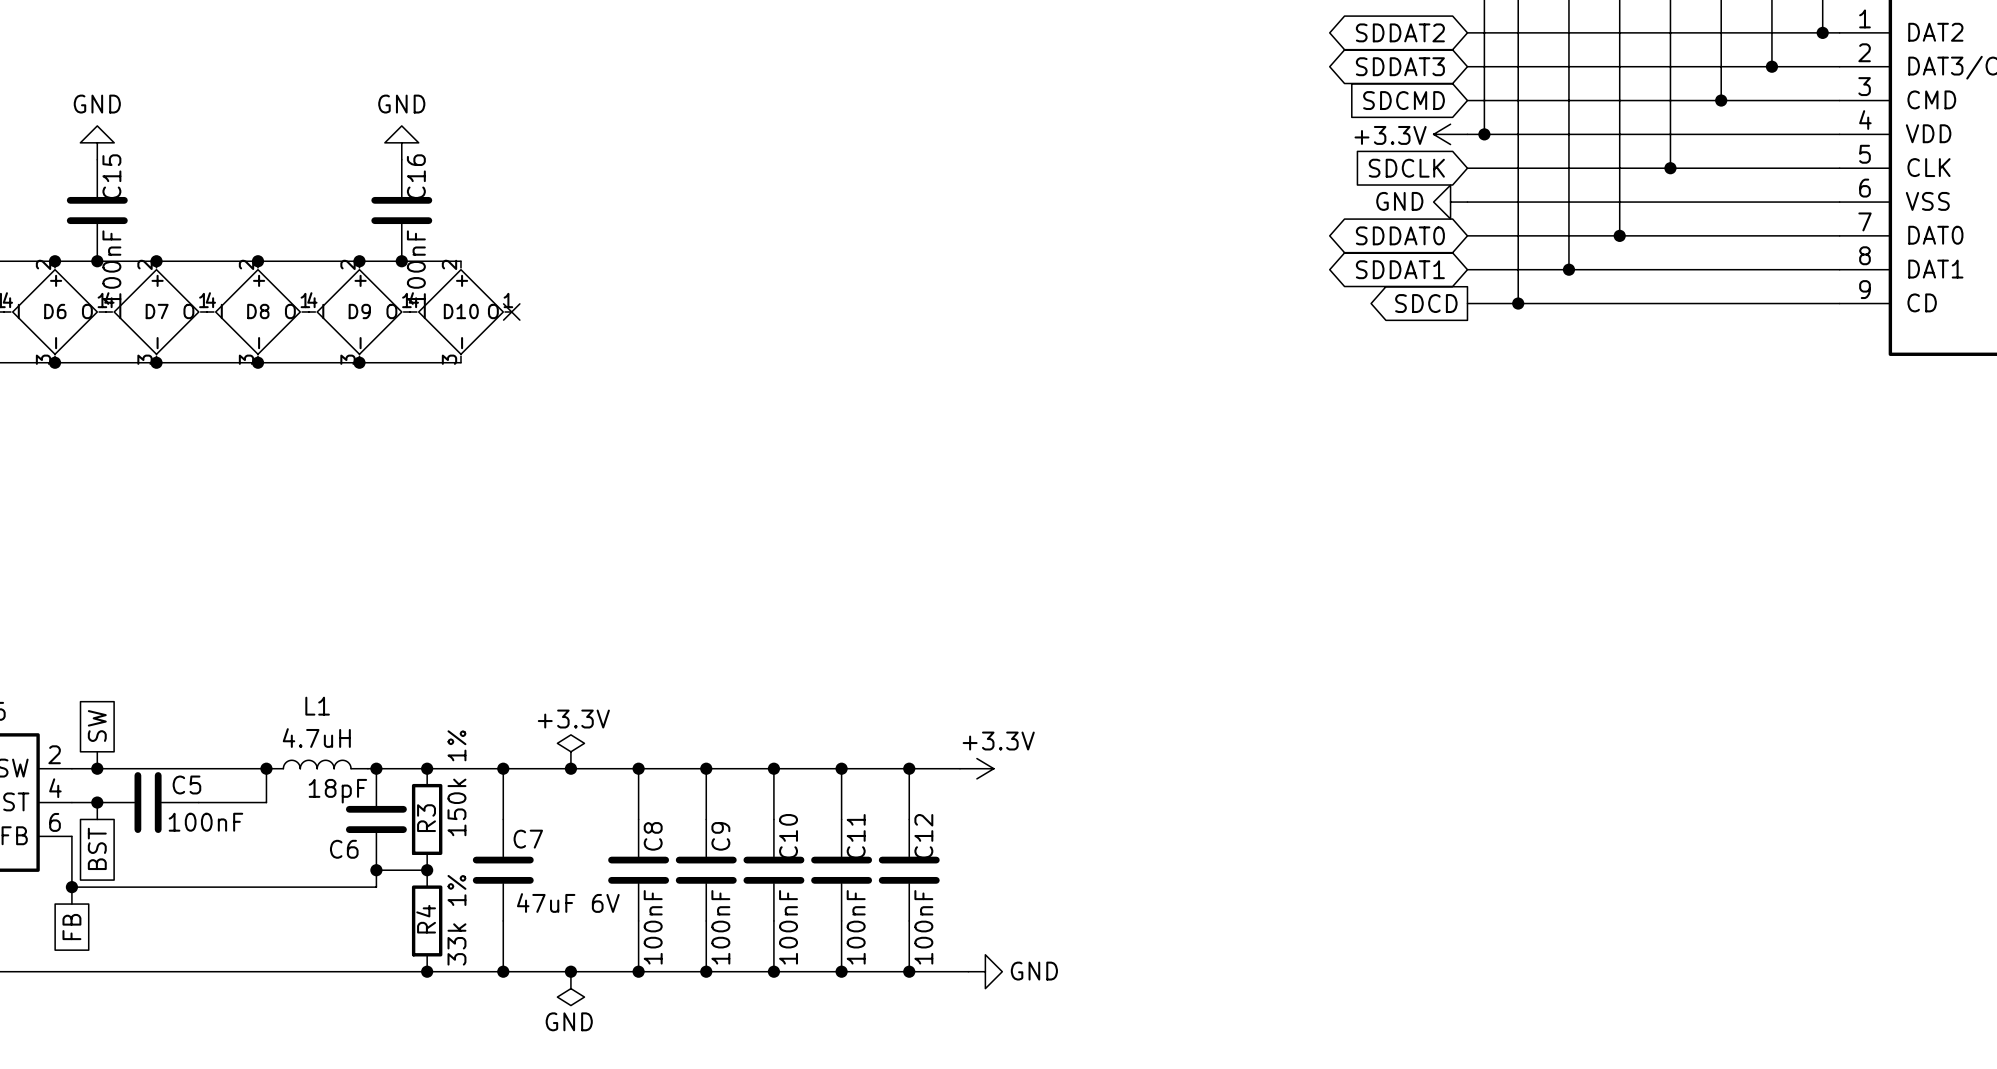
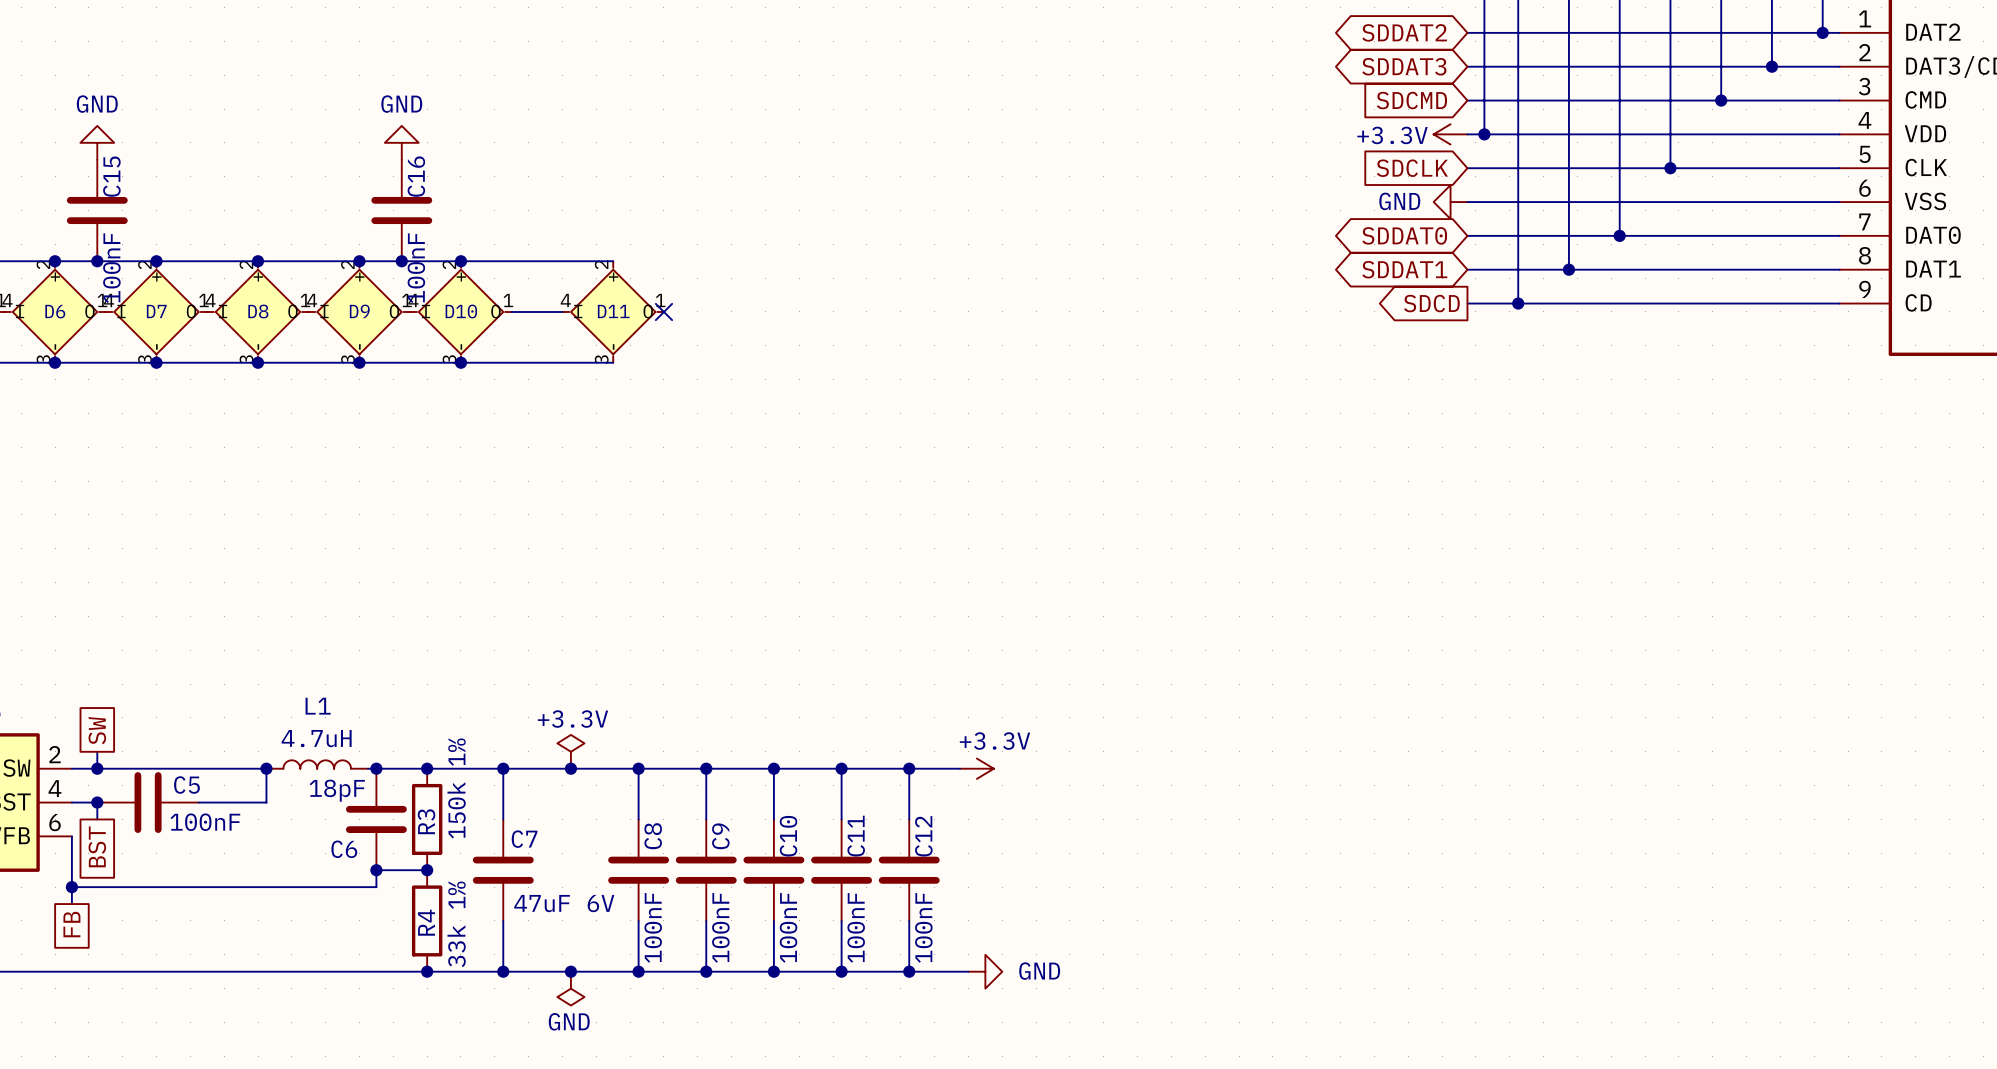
wire: none -> (460, 261) (613, 261)
junction: none -> (460, 261)
wire: none -> (511, 311) (562, 311)
no-connect mark: (511, 311) -> none
D11: none -> (613, 311)
no-connect mark: none -> (663, 311)
wire: none -> (460, 362) (613, 362)
junction: none -> (460, 362)

